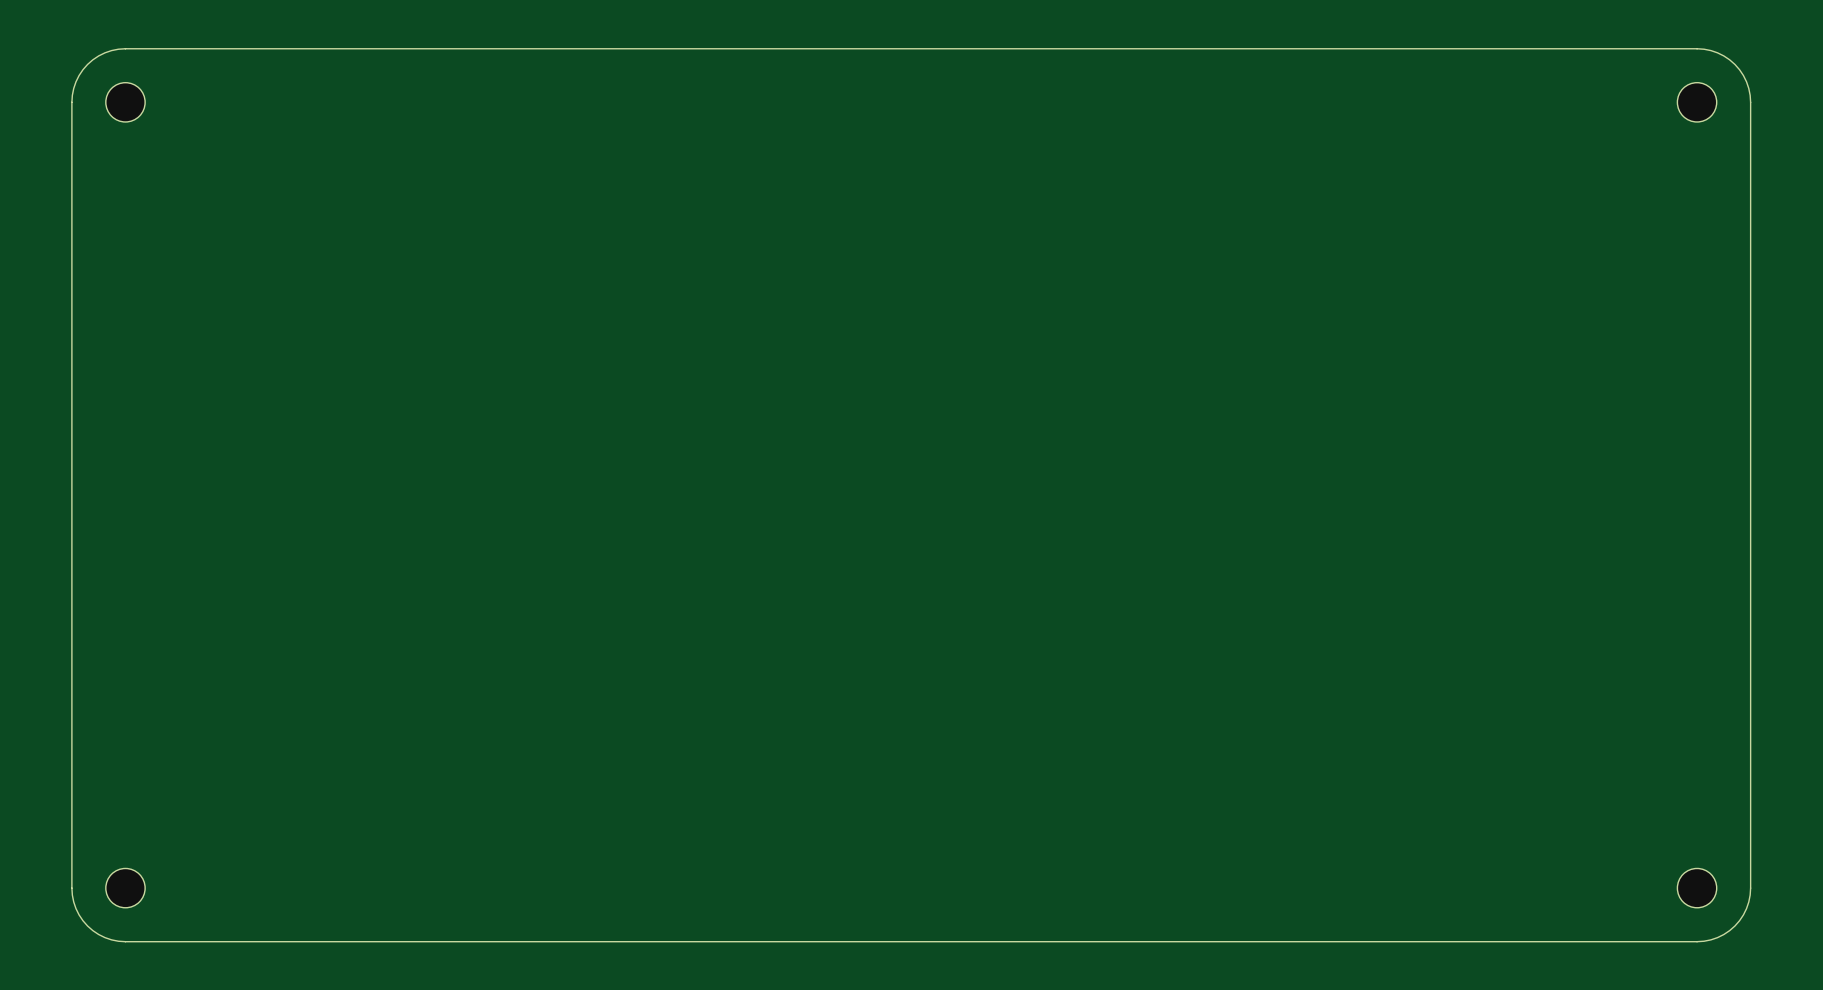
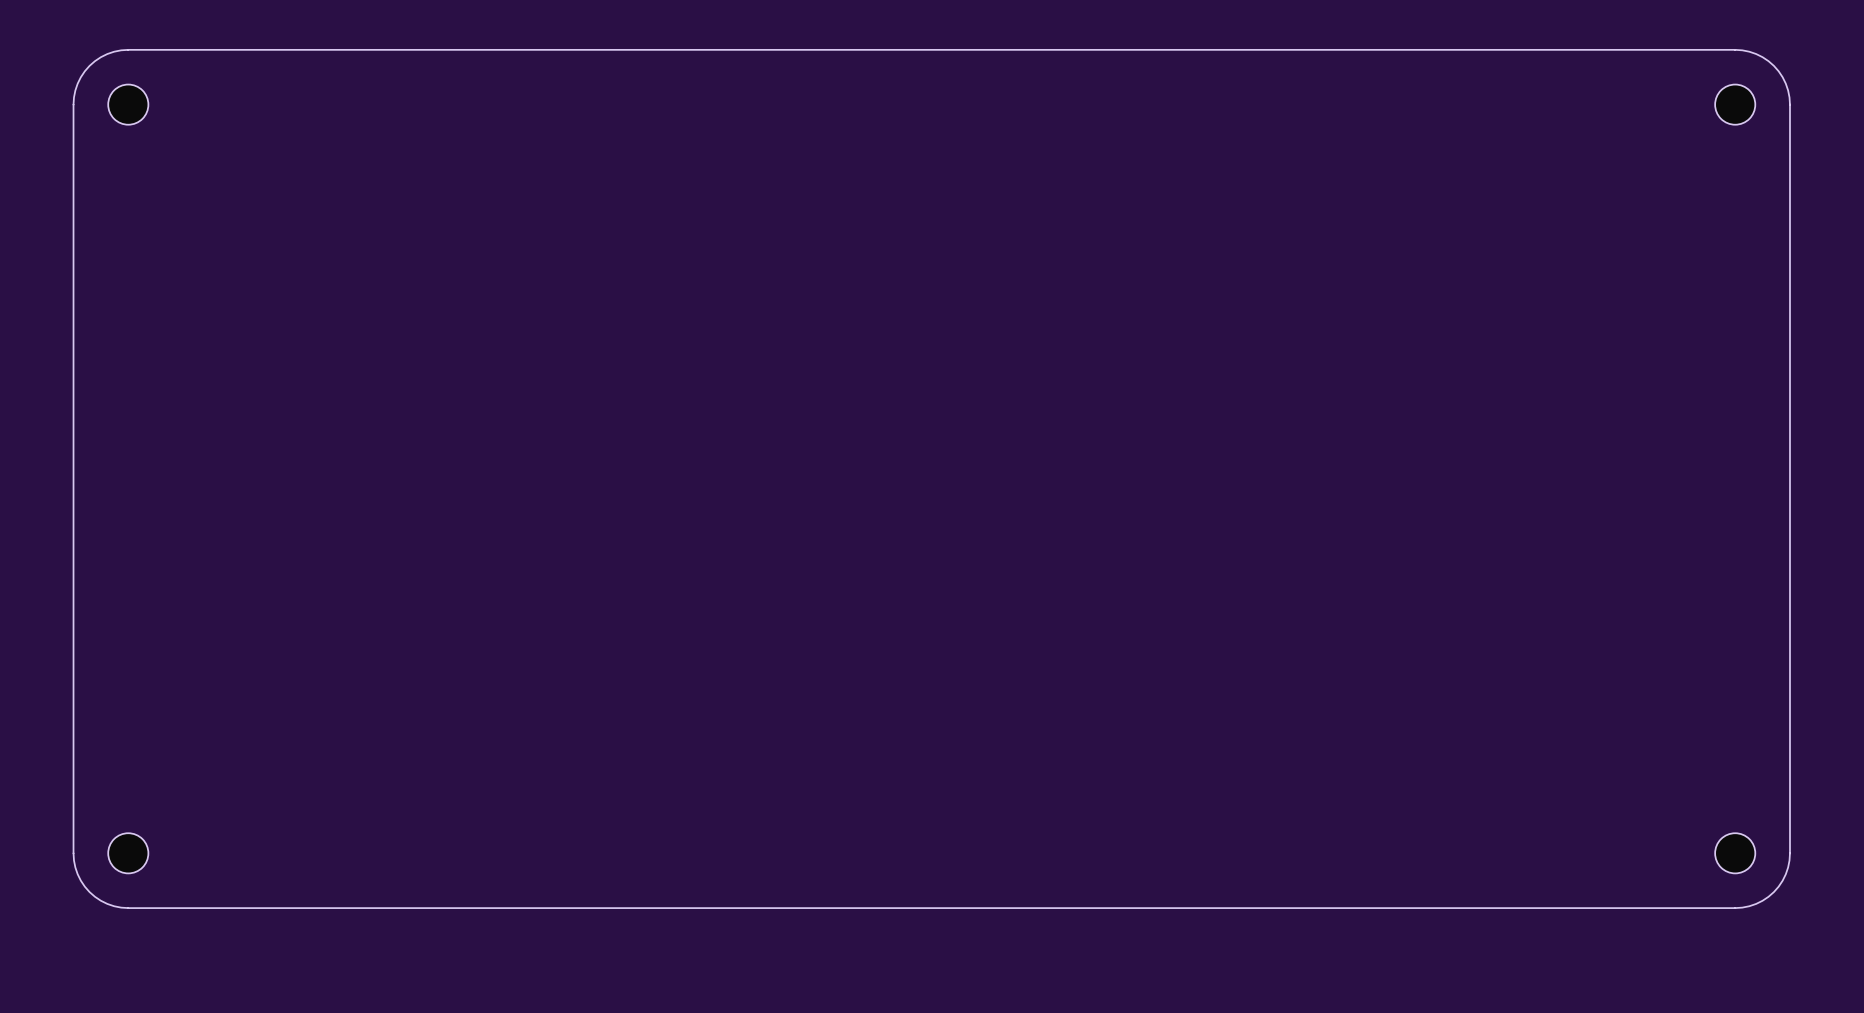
board edge: (1750, 834) (1750, 888) (1746, 908) (1739, 920) (1729, 930) (1717, 937) (1704, 941) (125, 941) (111, 939) (98, 934) (87, 926) (79, 914) (72, 895) (71, 834) -> (1789, 853) (1785, 874) (1773, 892) (1756, 903) (1735, 908) (128, 908) (107, 903) (89, 892) (77, 874) (73, 853)
part position: (125, 888) -> (128, 853)
part position: (1697, 888) -> (1735, 853)

